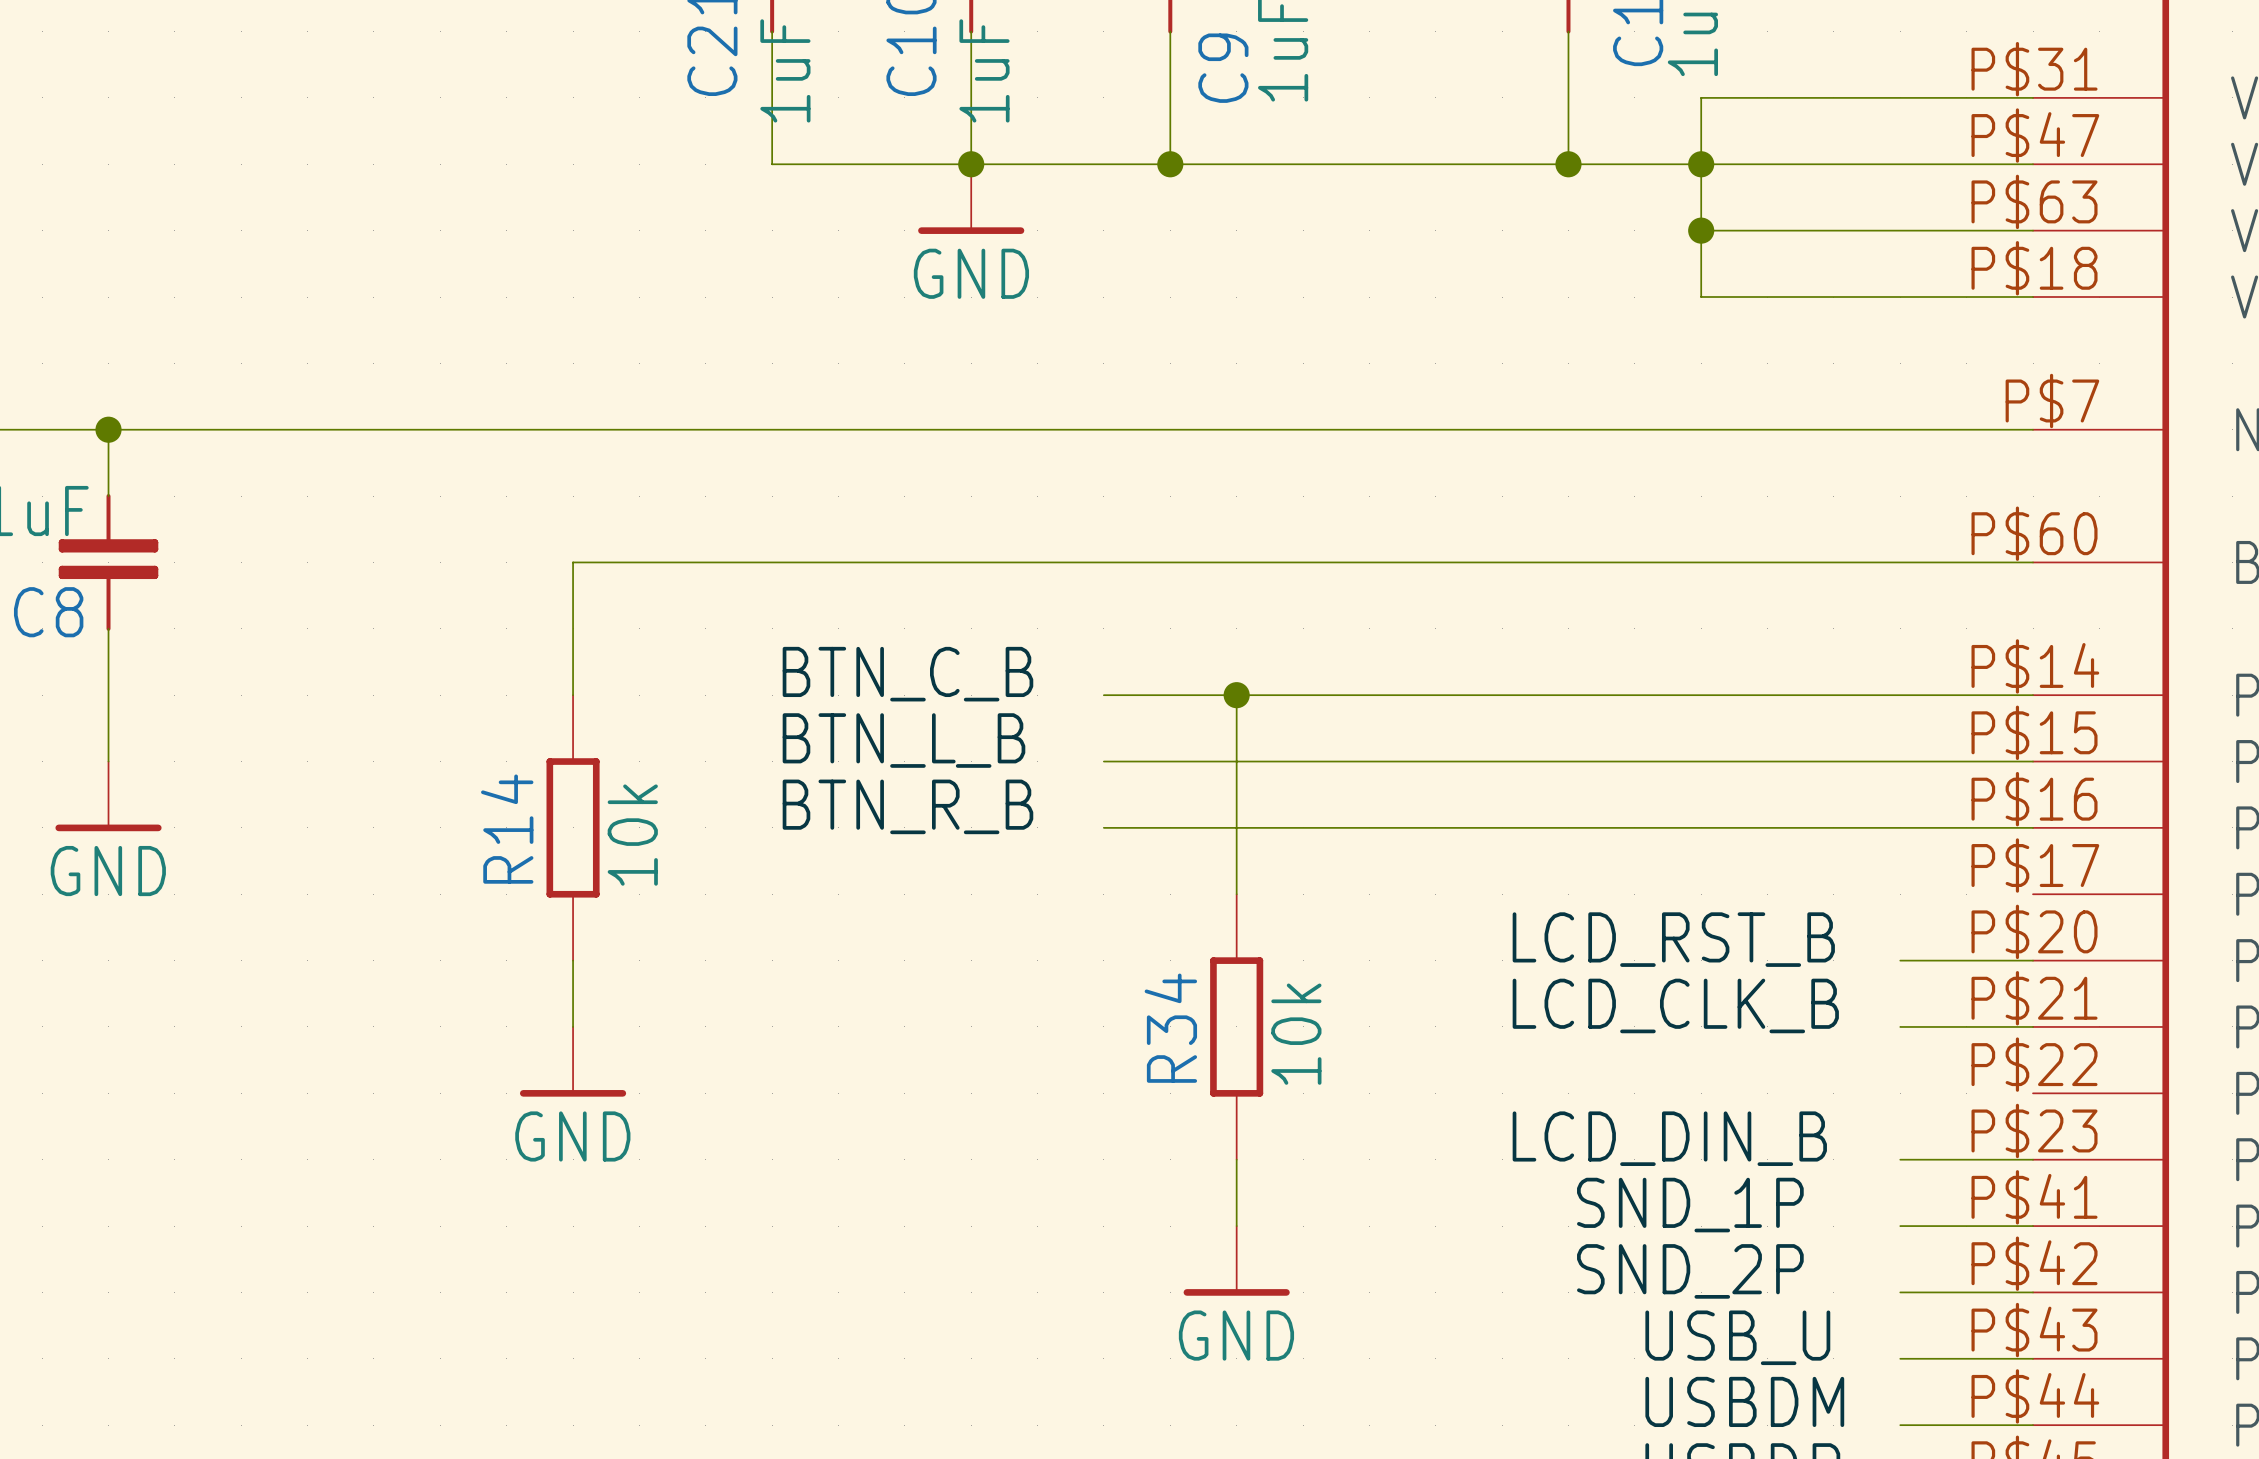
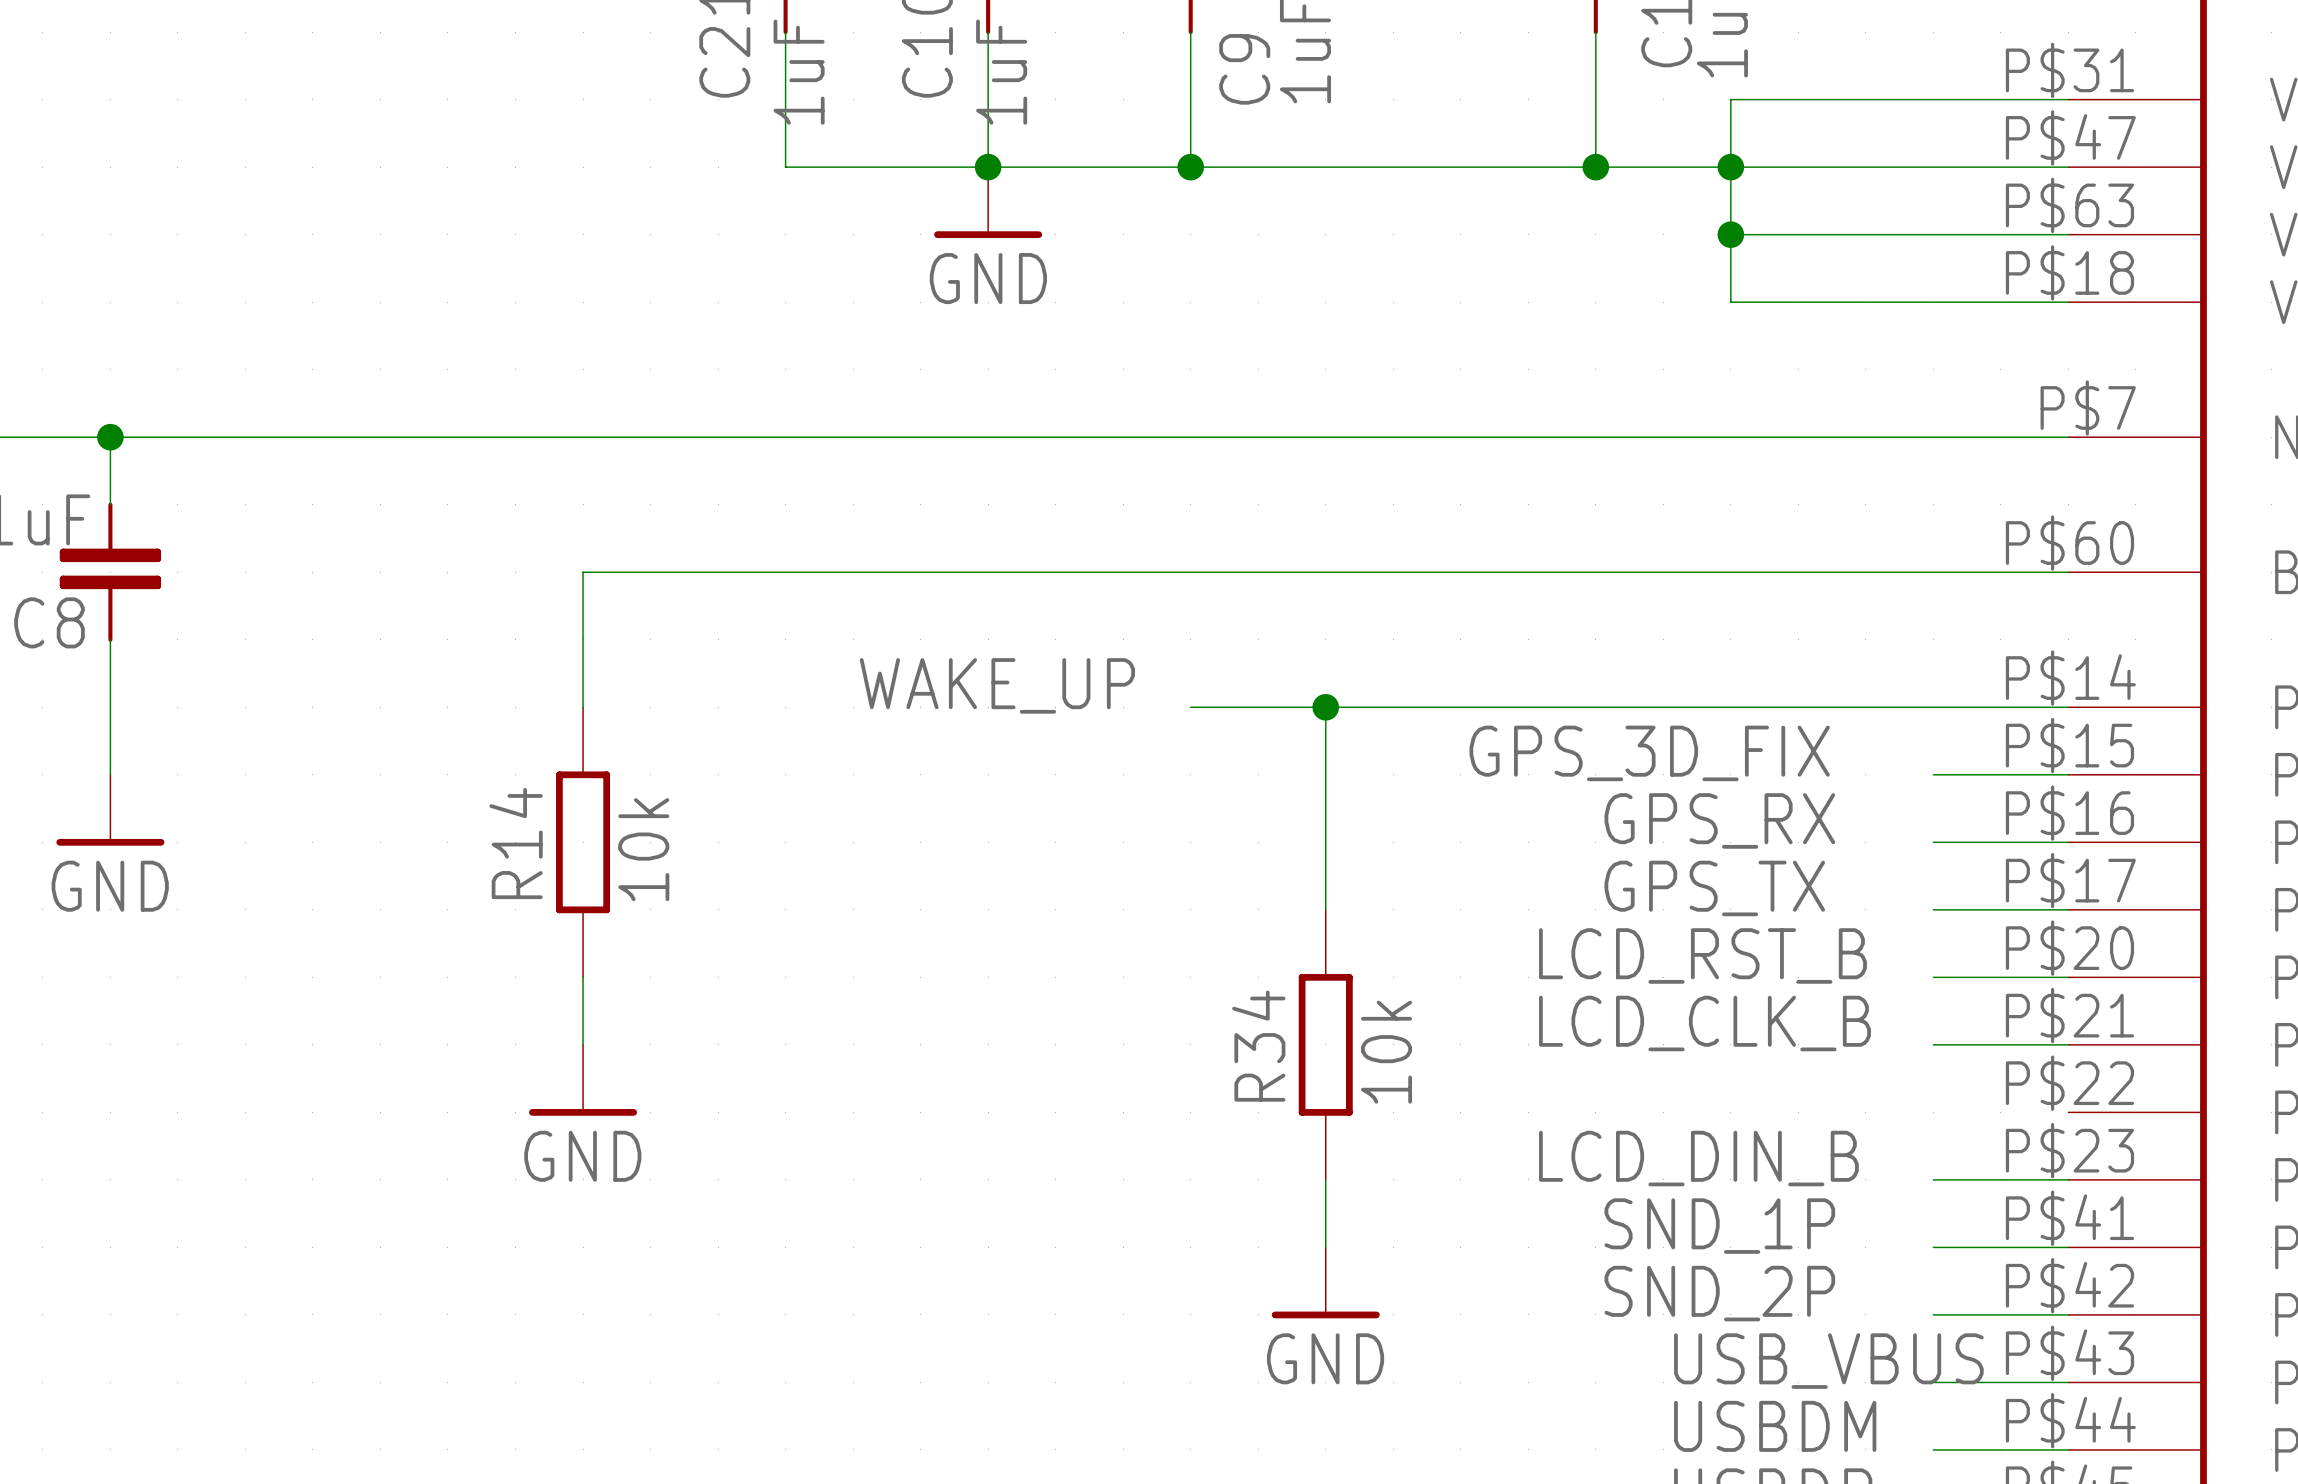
label: BTN_C_B (907, 674) -> none
label: none -> WAKE_UP (997, 685)
wire: (1103, 695) (1170, 695) -> none
wire: (1236, 695) (1236, 894) -> (1325, 707) (1325, 909)
junction position: (1236, 695) -> (1325, 707)
label: BTN_L_B (903, 740) -> none
label: none -> GPS_3D_FIX (1649, 753)
wire: (1103, 761) (1900, 761) -> none
label: BTN_R_B (907, 806) -> none
label: none -> GPS_RX (1719, 820)
wire: (1103, 827) (1900, 827) -> none
label: none -> GPS_TX (1714, 888)
wire: none -> (1933, 909) (2068, 909)
R34 position: (1236, 1026) -> (1325, 1044)
wire: (1236, 1159) (1236, 1226) -> (1325, 1179) (1325, 1247)
power symbol position: GND (1236, 1260) -> GND (1325, 1282)
label: USB_U (1737, 1337) -> USB_VBUS (1828, 1361)

